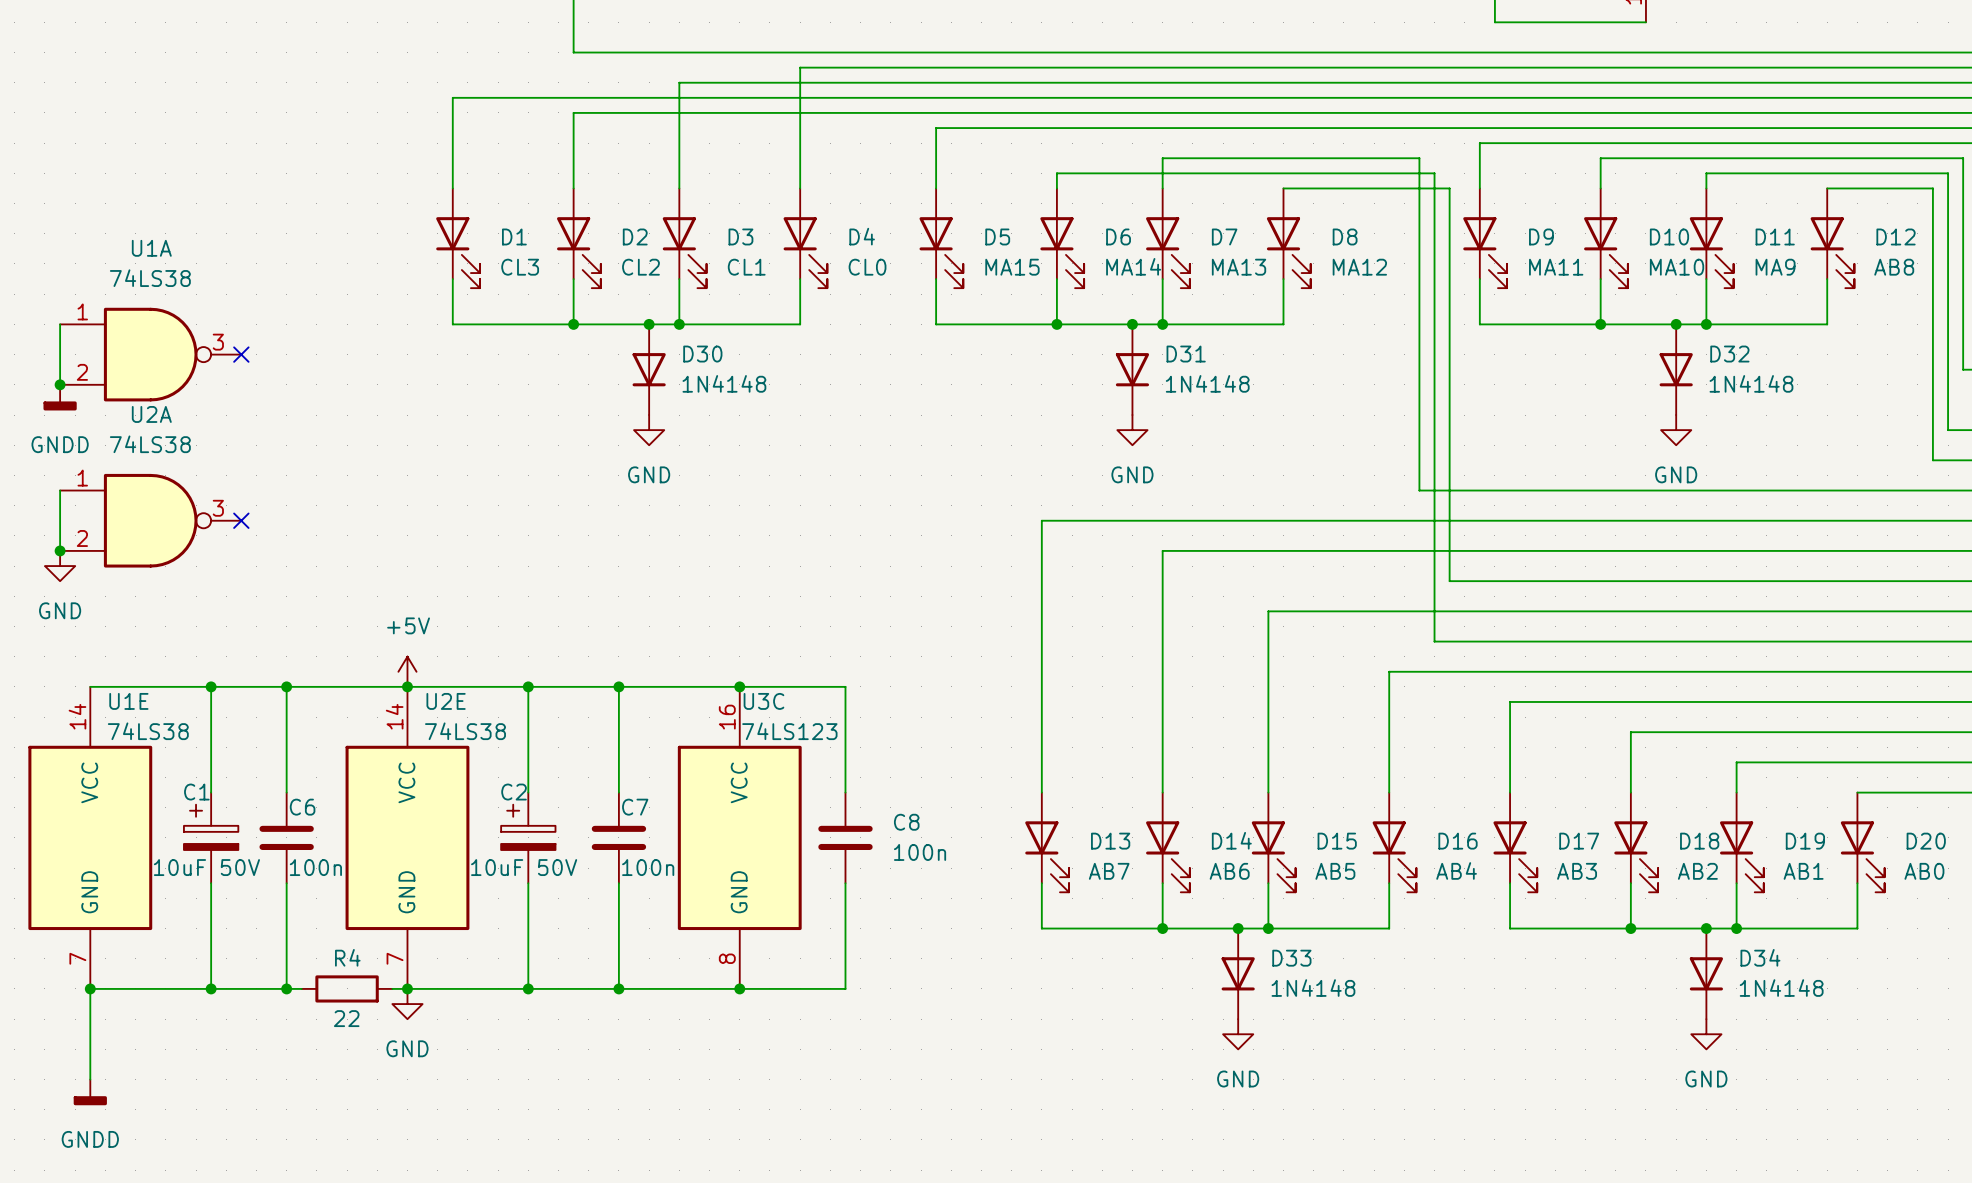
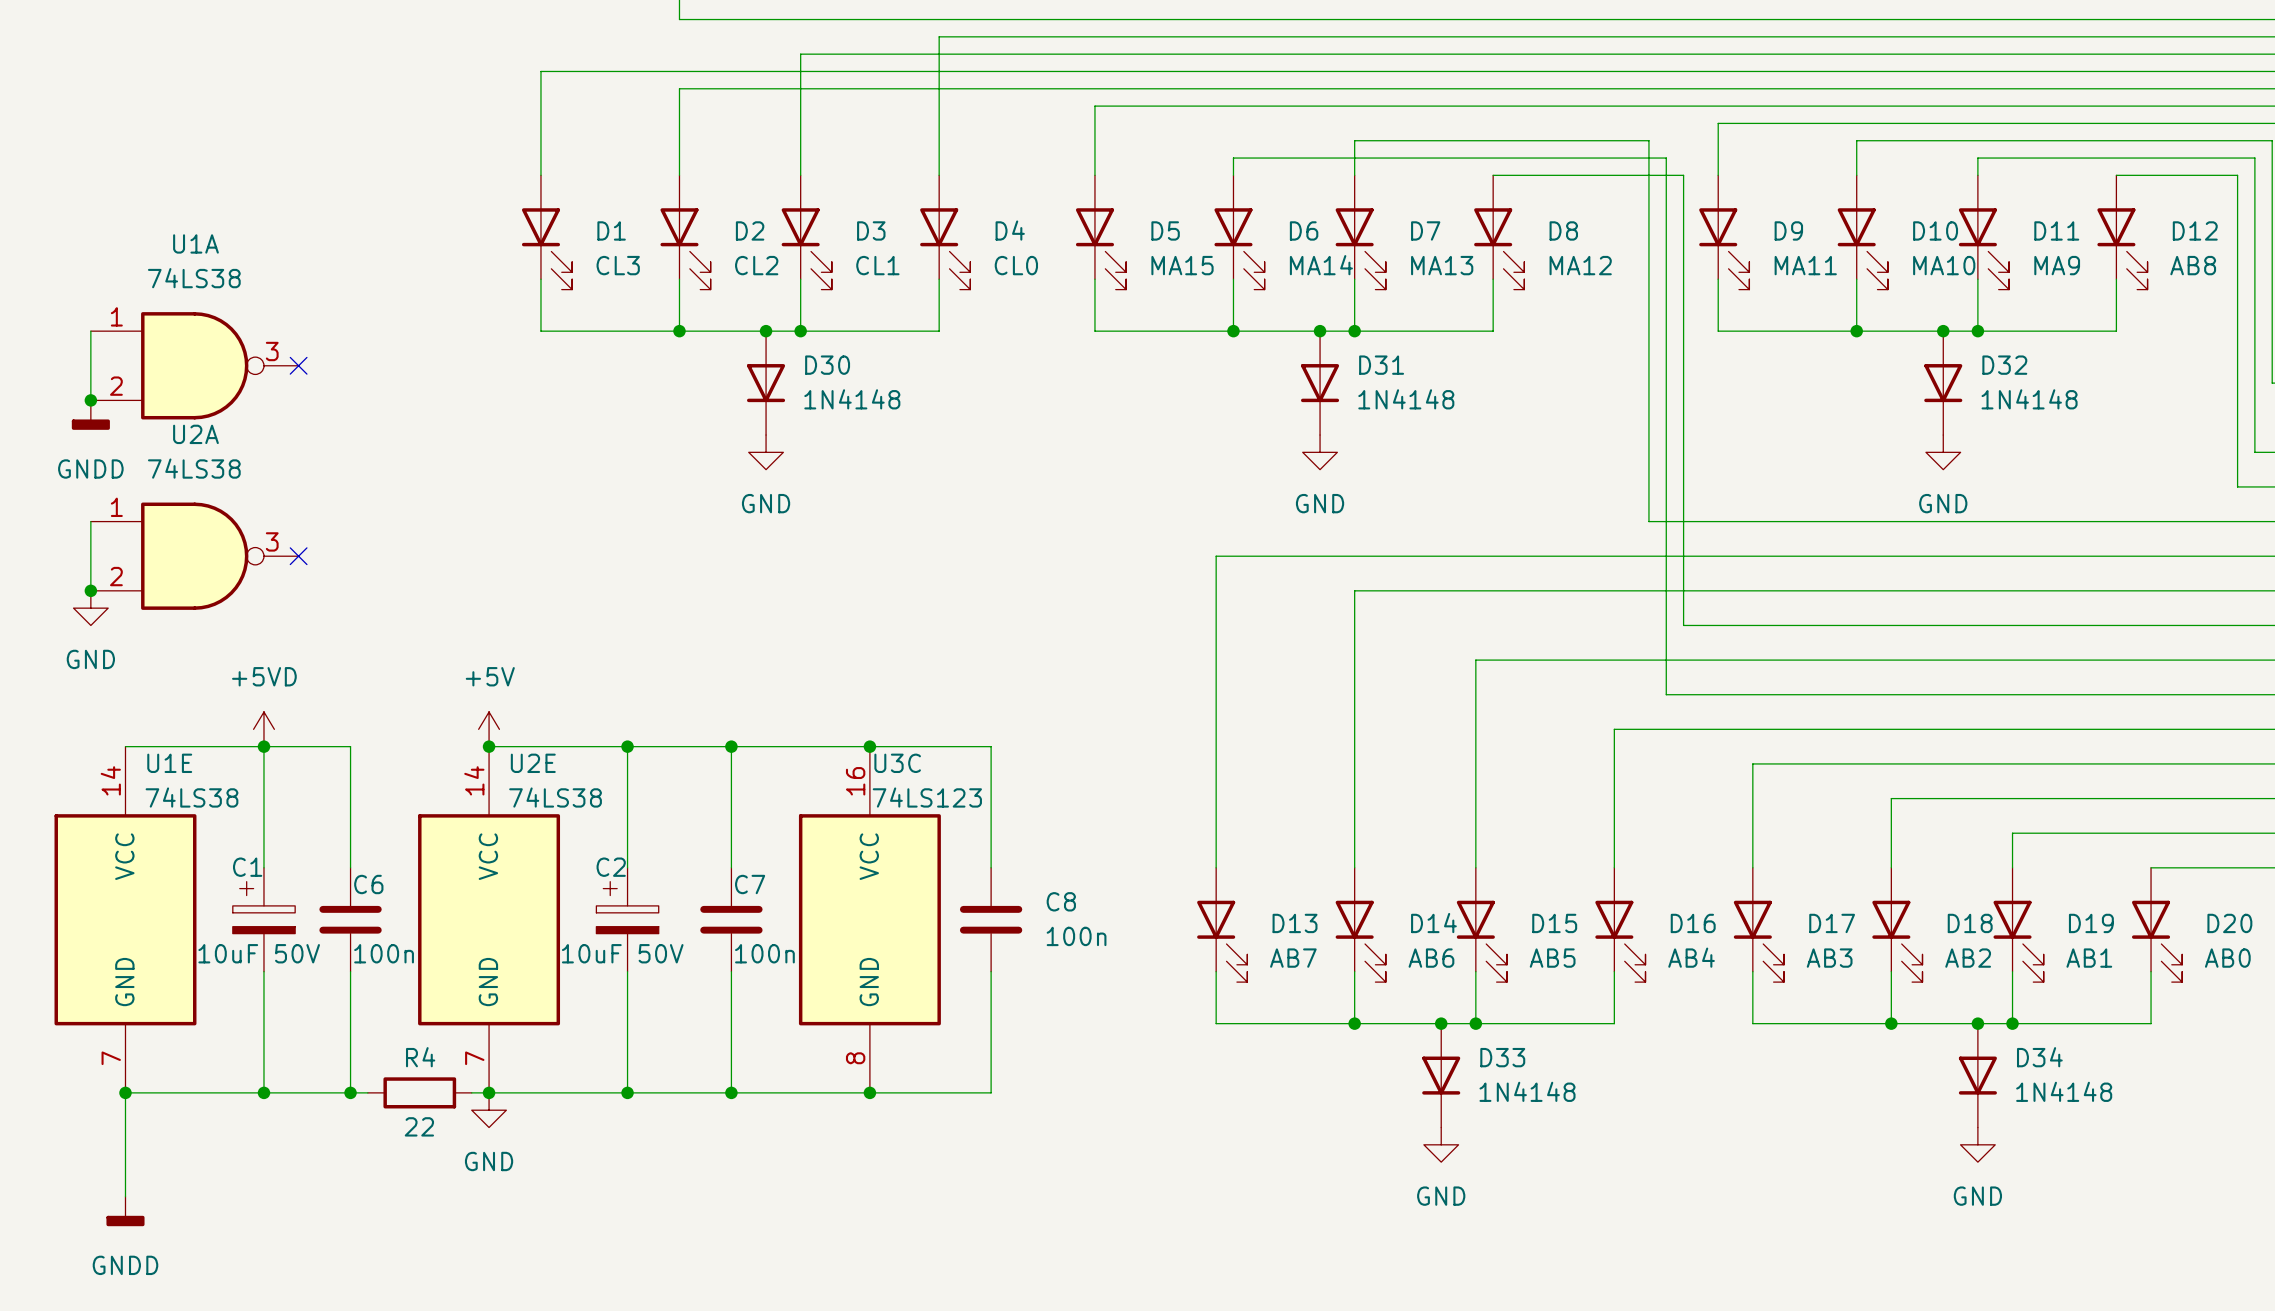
power symbol: none -> +5VD (263, 729)
wire: (286, 686) (407, 686) -> none
junction: (286, 686) -> none

